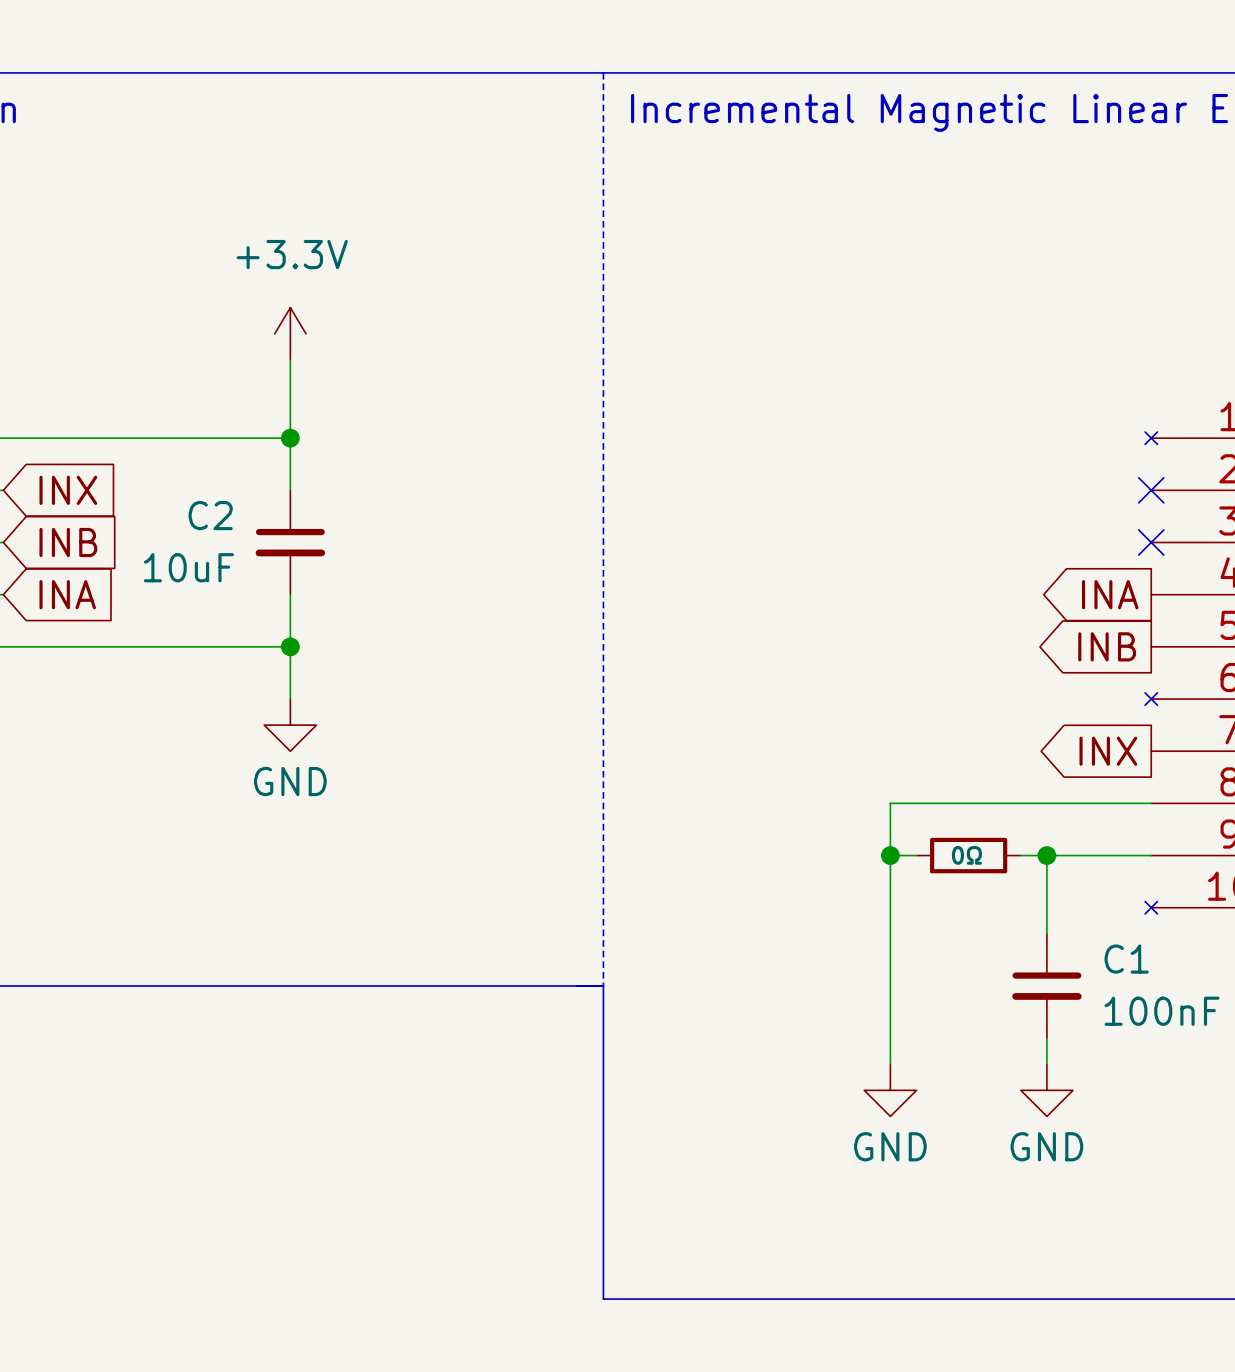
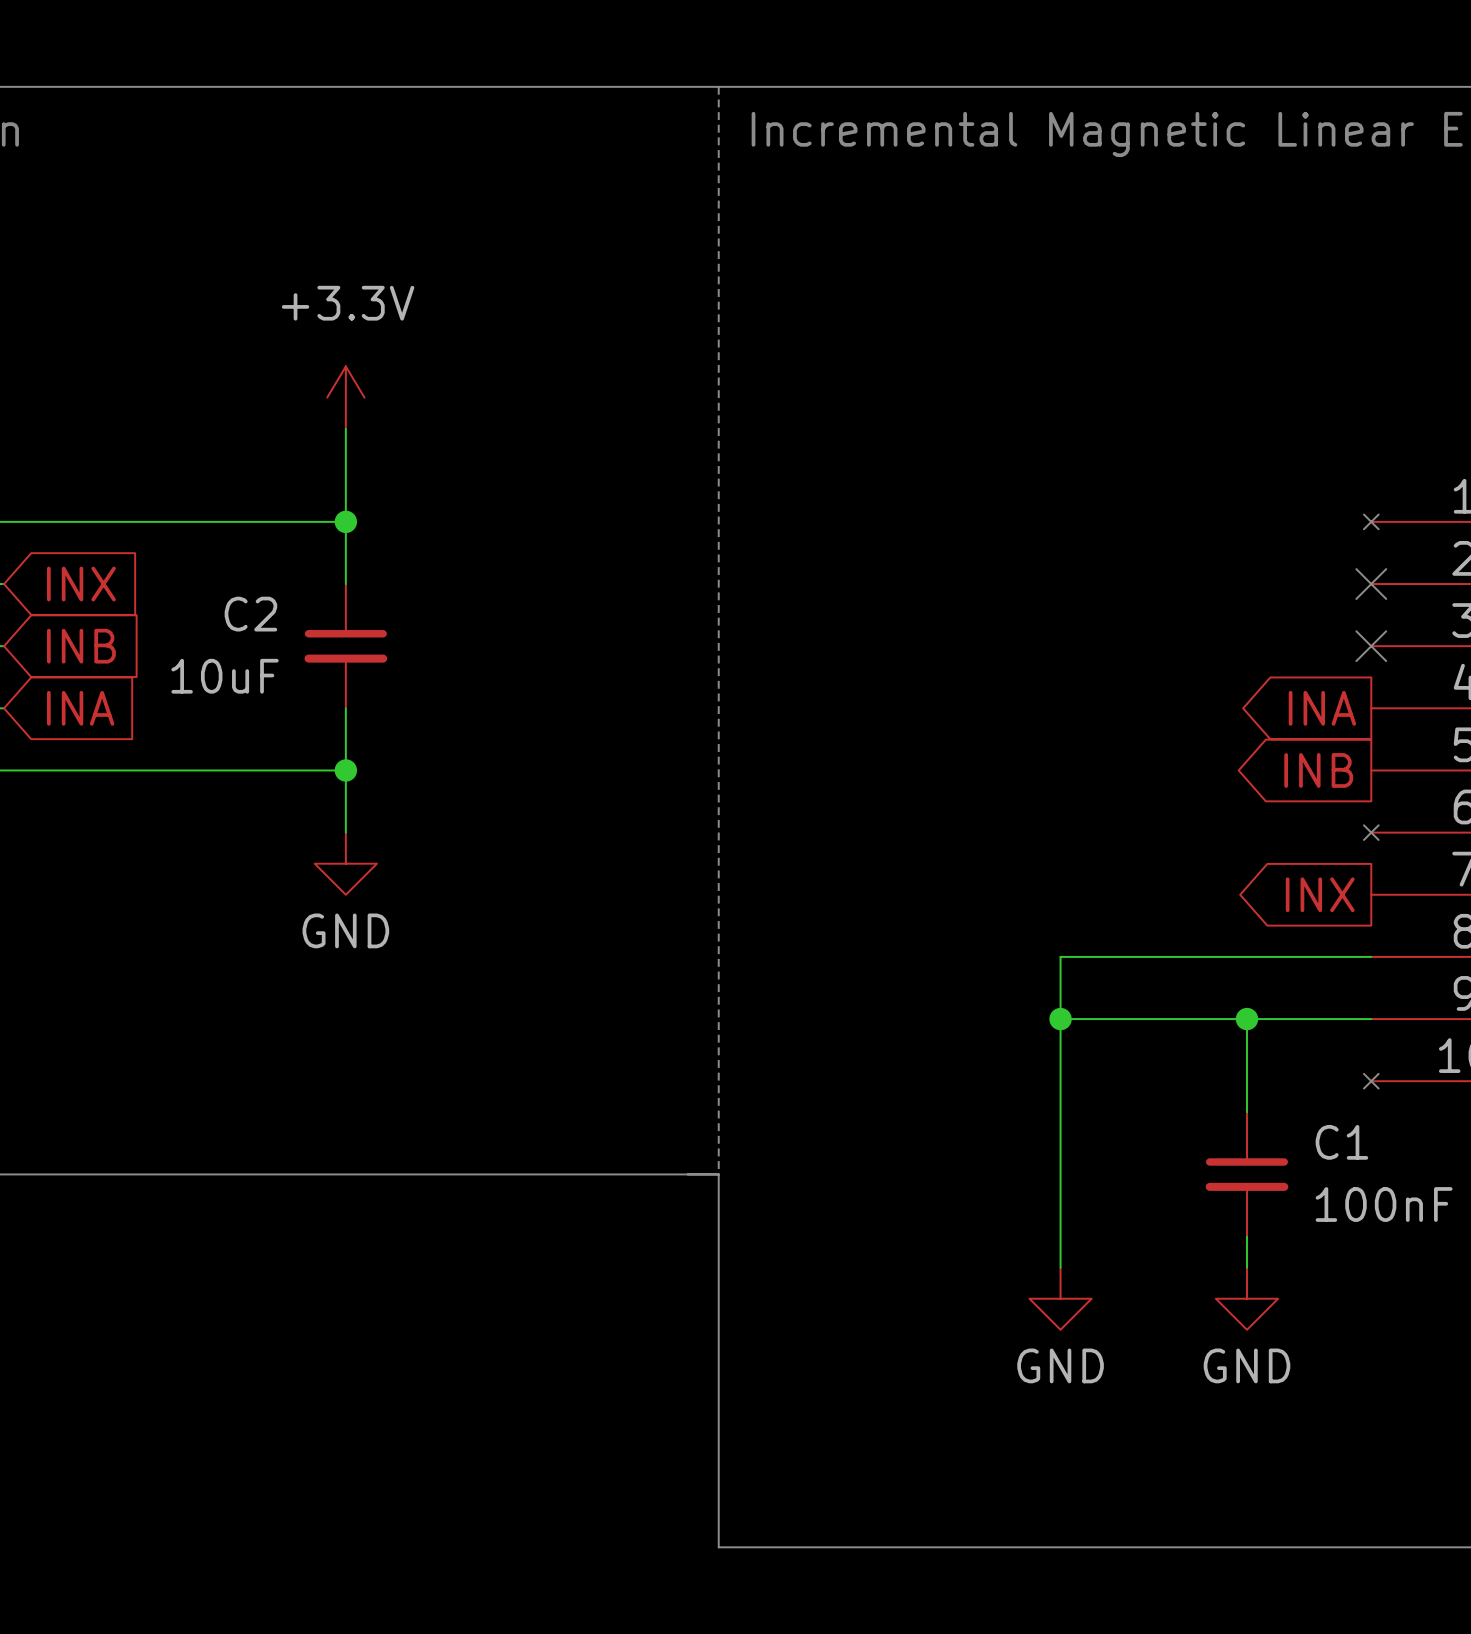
wire: none -> (1091, 1019) (1215, 1019)
part: 0Ω (968, 855) -> none

